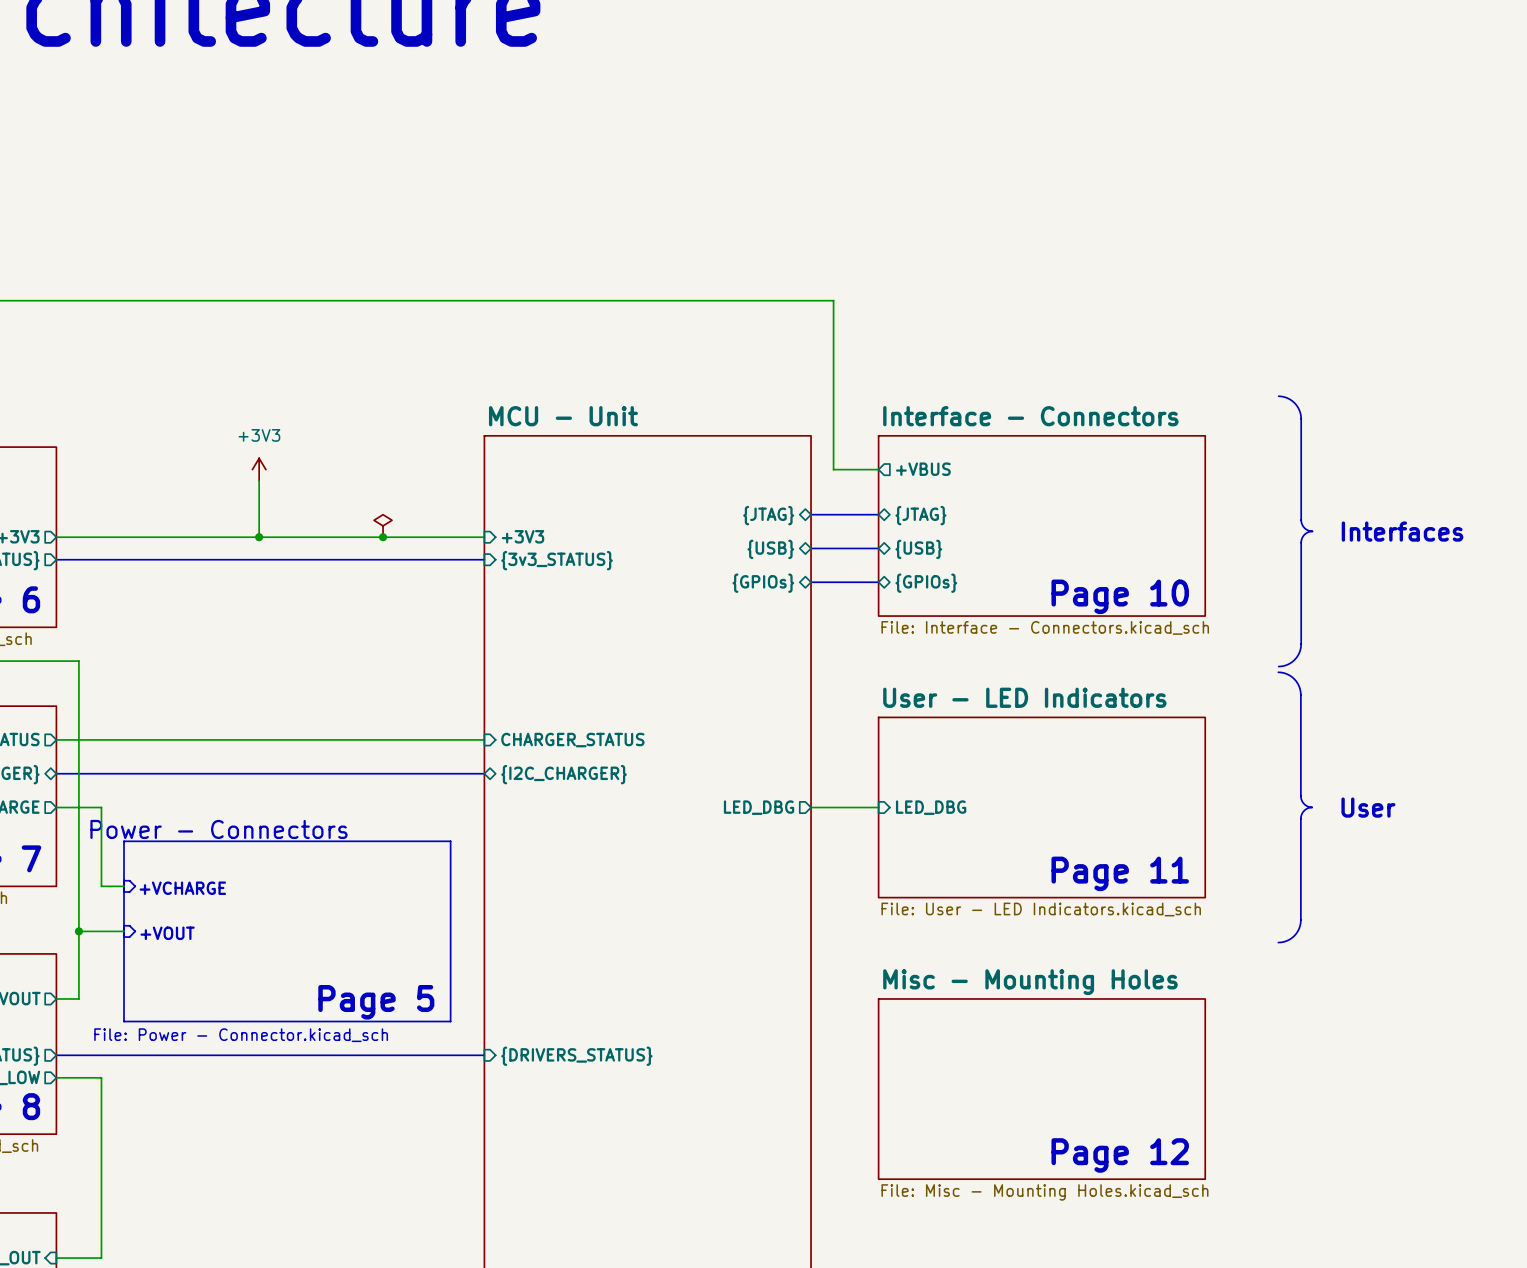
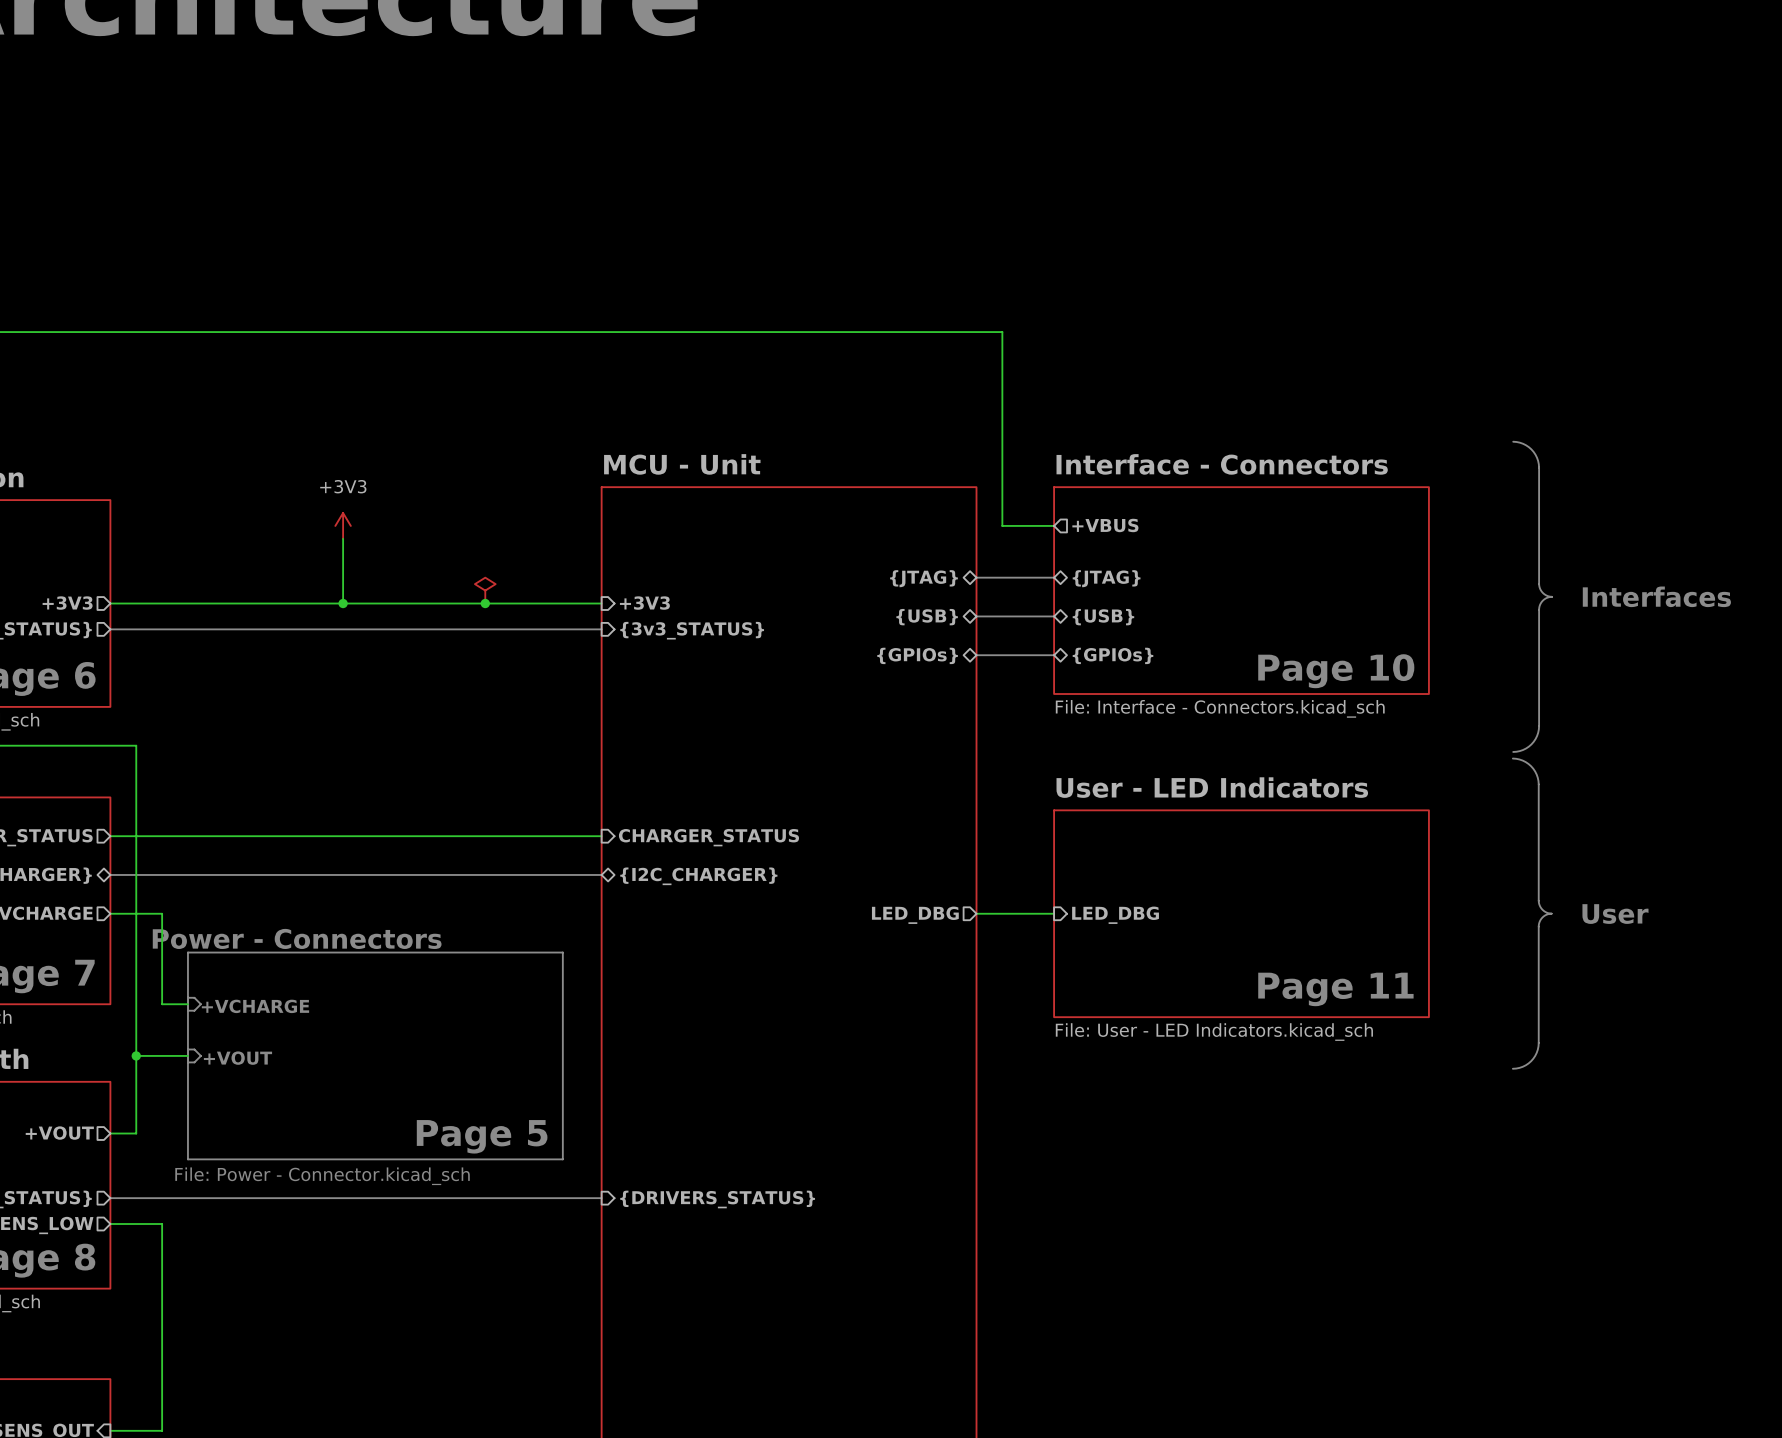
sheet Misc - Mounting Holes: File: Misc - Mounting Holes.kicad_sch (1041, 1089) -> none
text: Page 12 (1120, 1155) -> none

